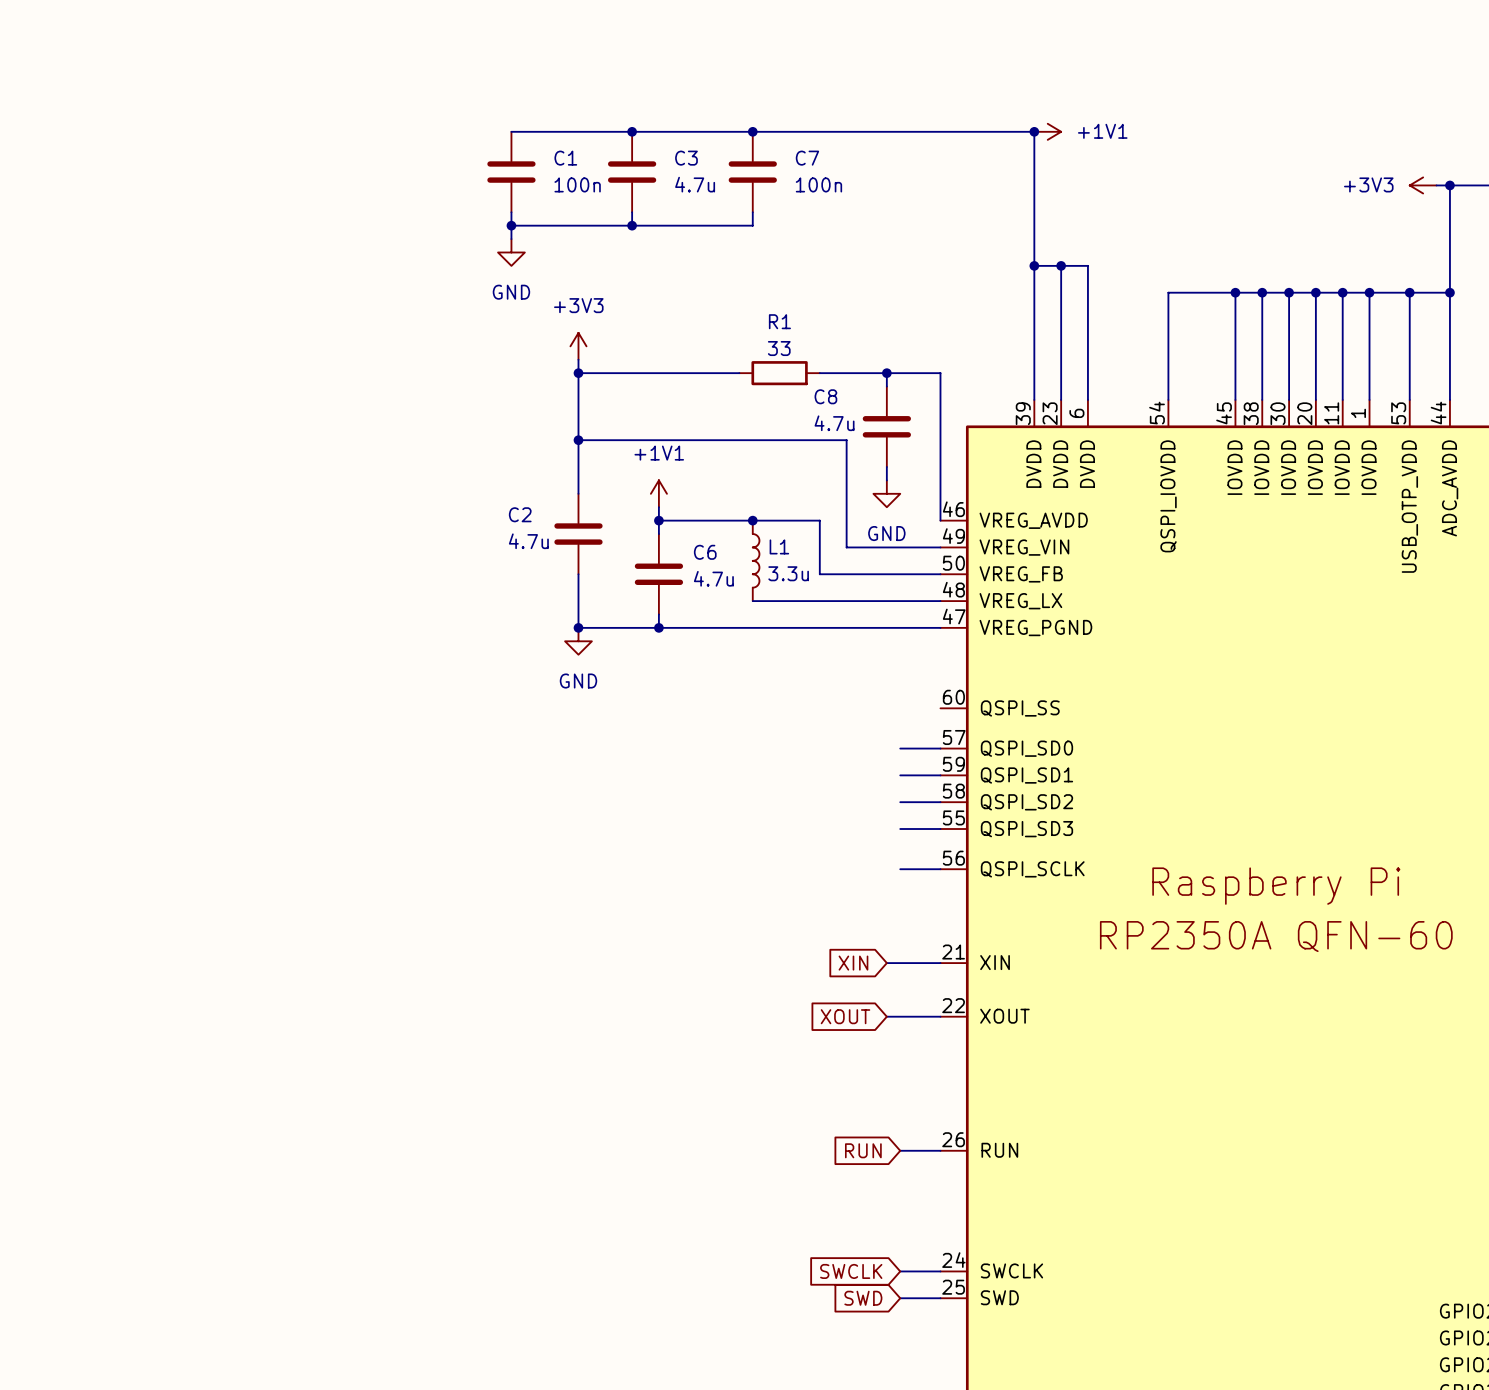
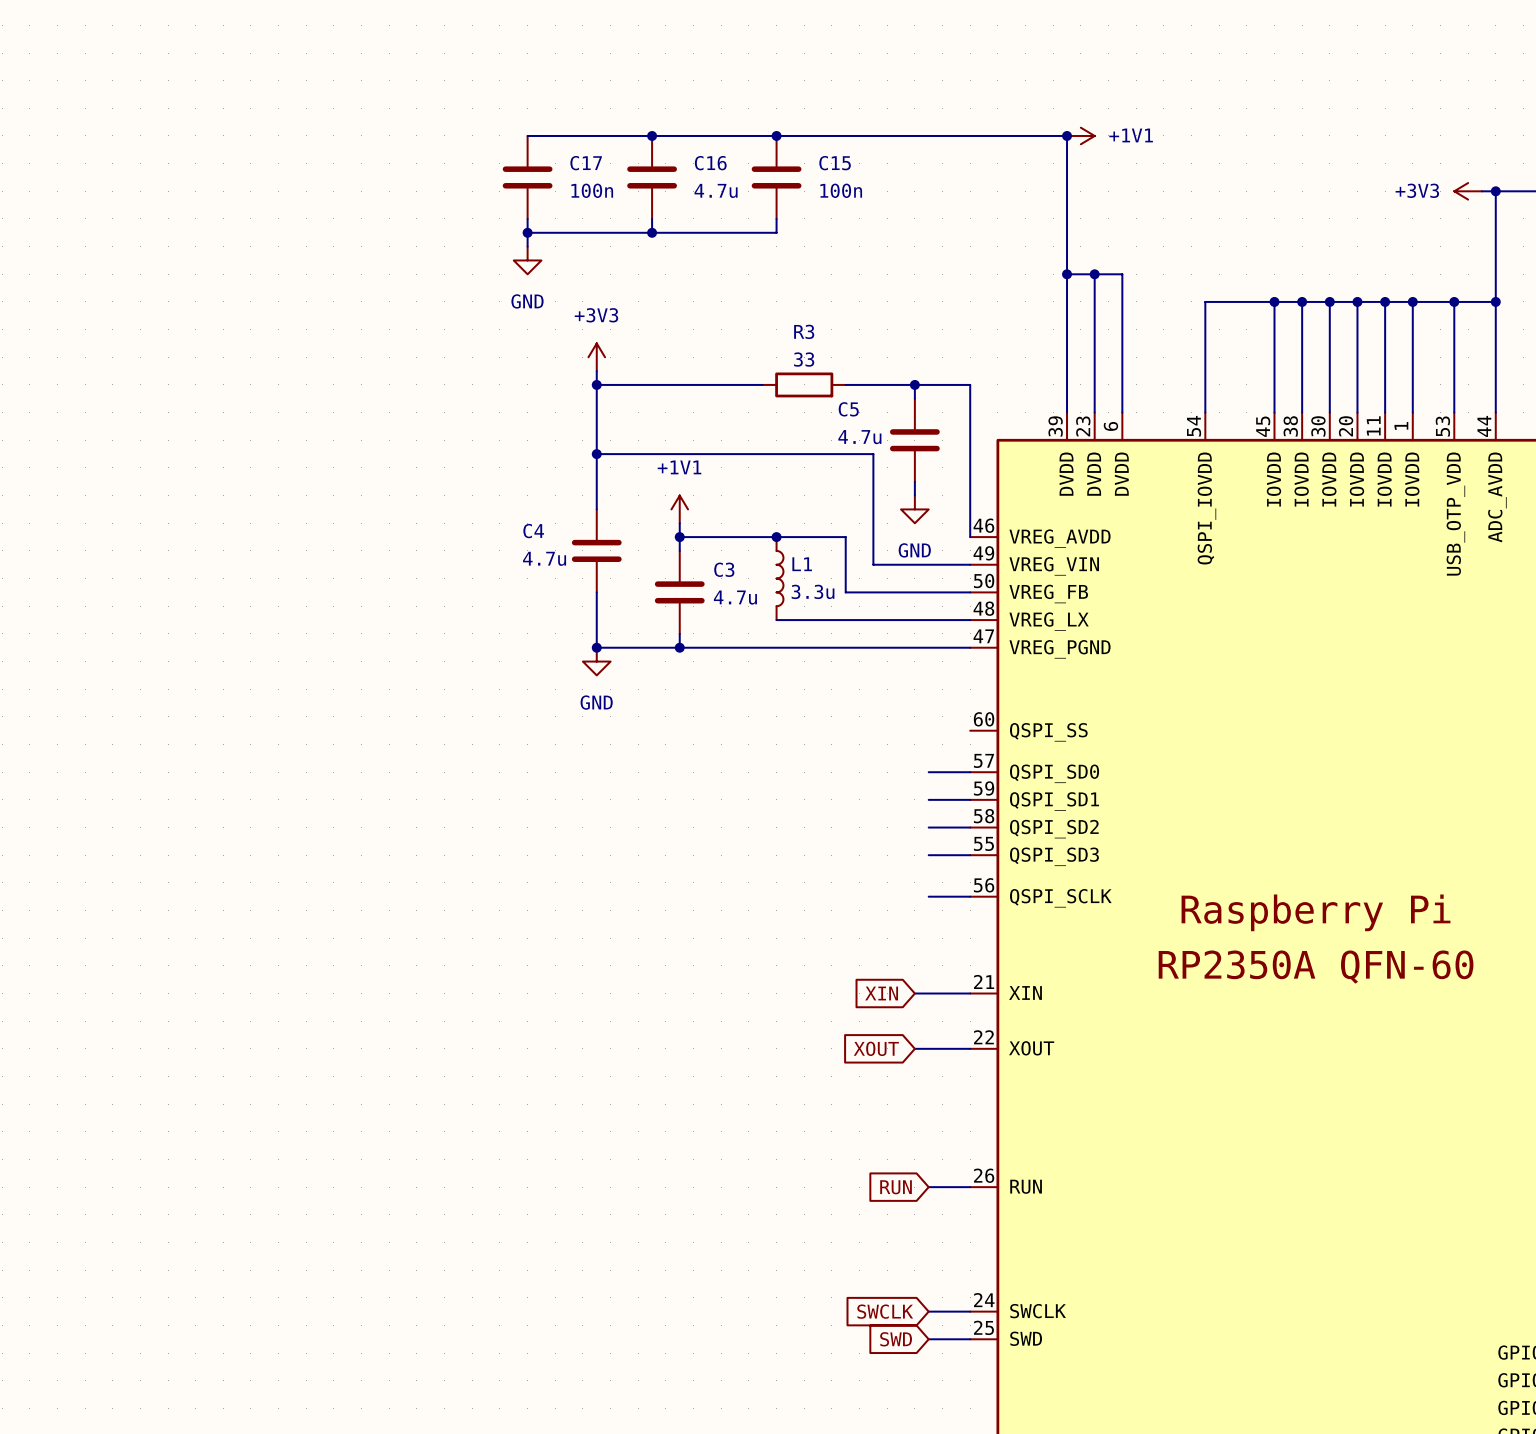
C1 name: C1 (565, 158) -> C17 (586, 163)
C3 name: C3 (686, 158) -> C16 (710, 163)
C7 name: C7 (807, 158) -> C15 (835, 163)
R1 name: R1 (779, 321) -> R3 (804, 331)
C8 name: C8 (825, 396) -> C5 (848, 409)
C2 name: C2 (520, 514) -> C4 (533, 531)
C6 name: C6 (705, 552) -> C3 (724, 569)

